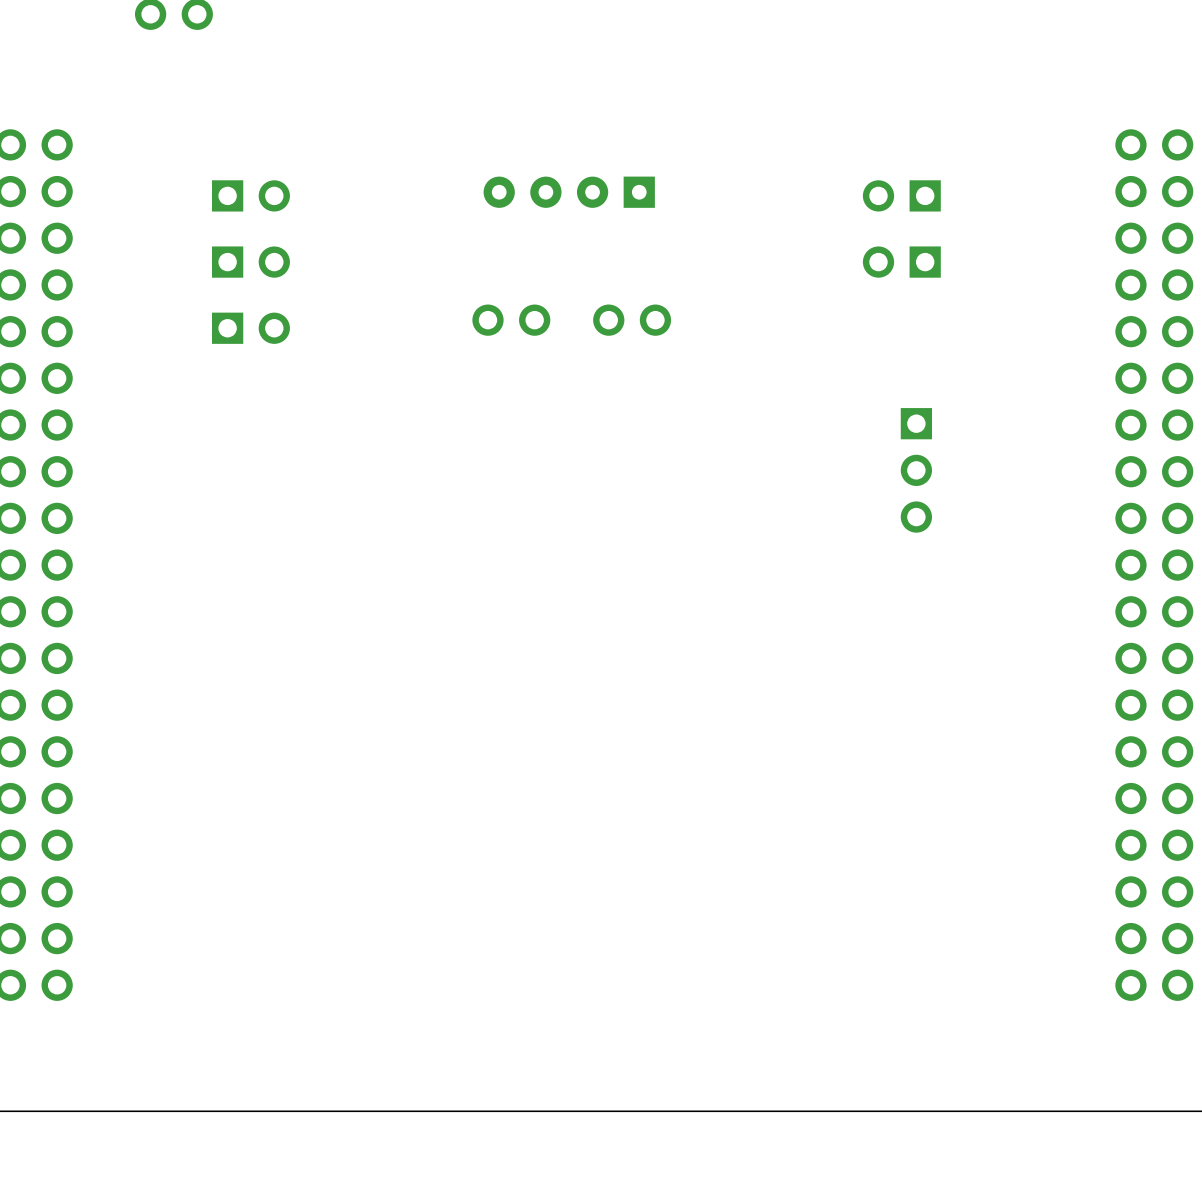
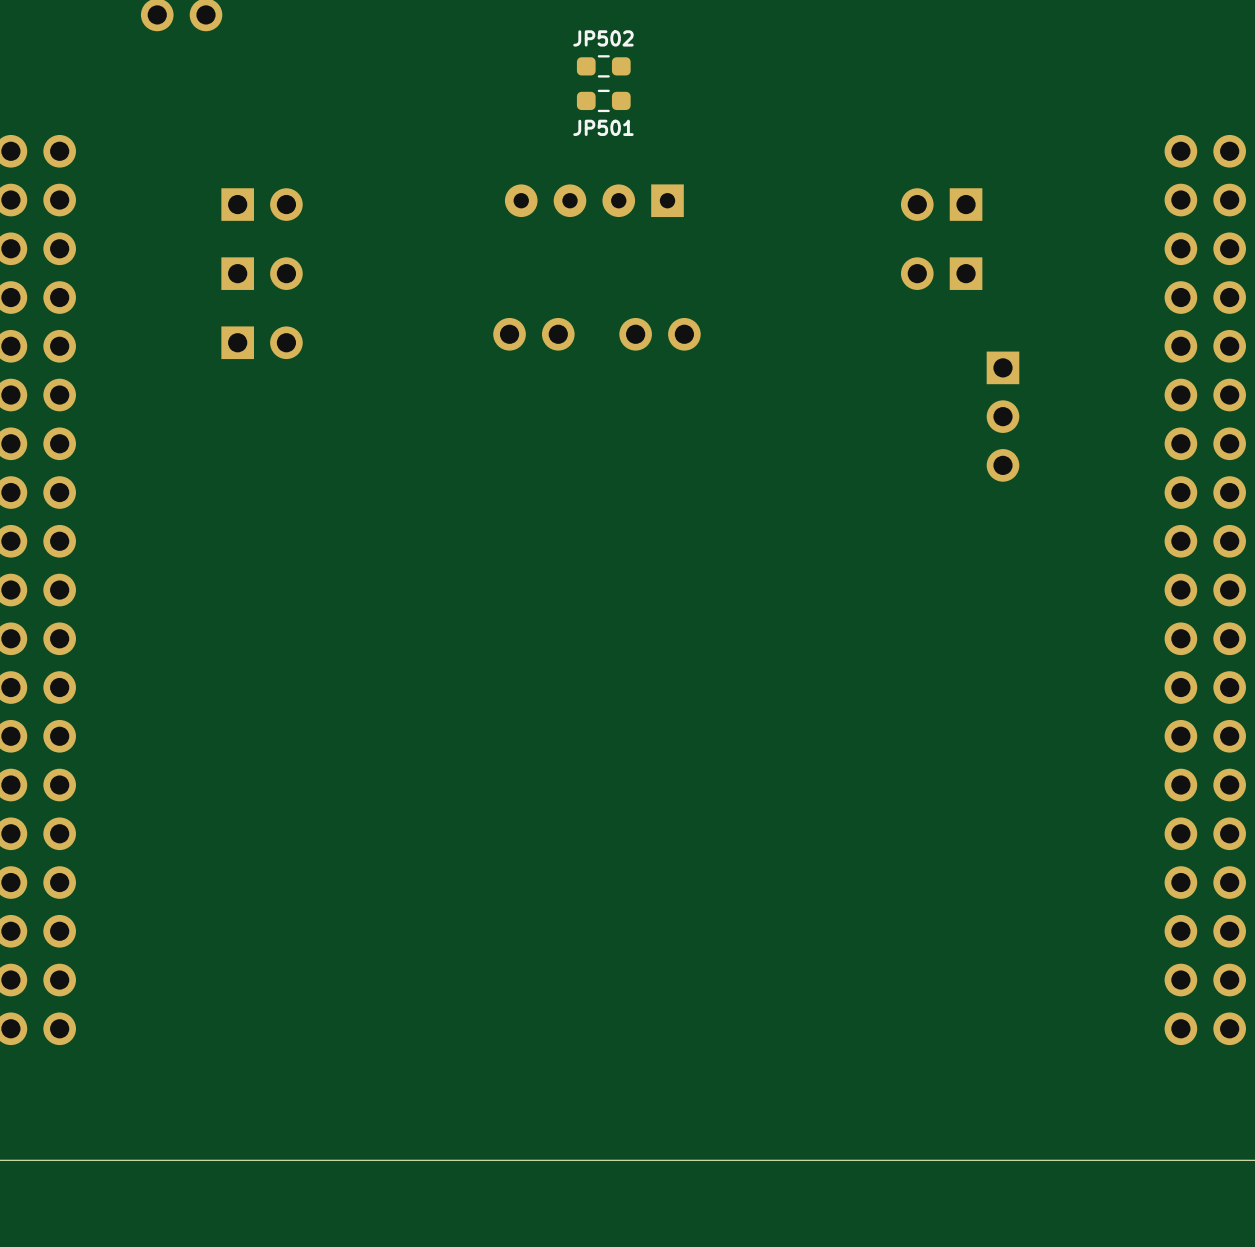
JP502: none -> (603, 66)
JP501: none -> (603, 100)
part position: (916, 470) -> (1002, 416)

